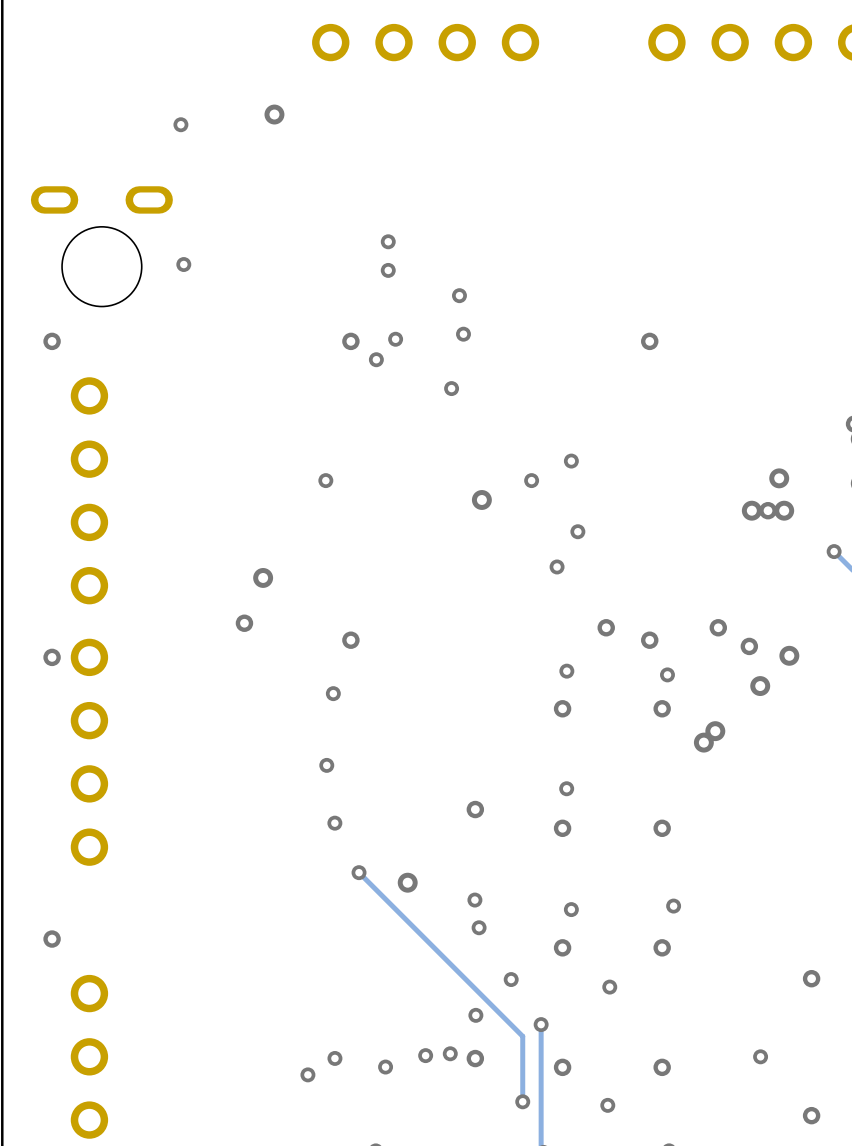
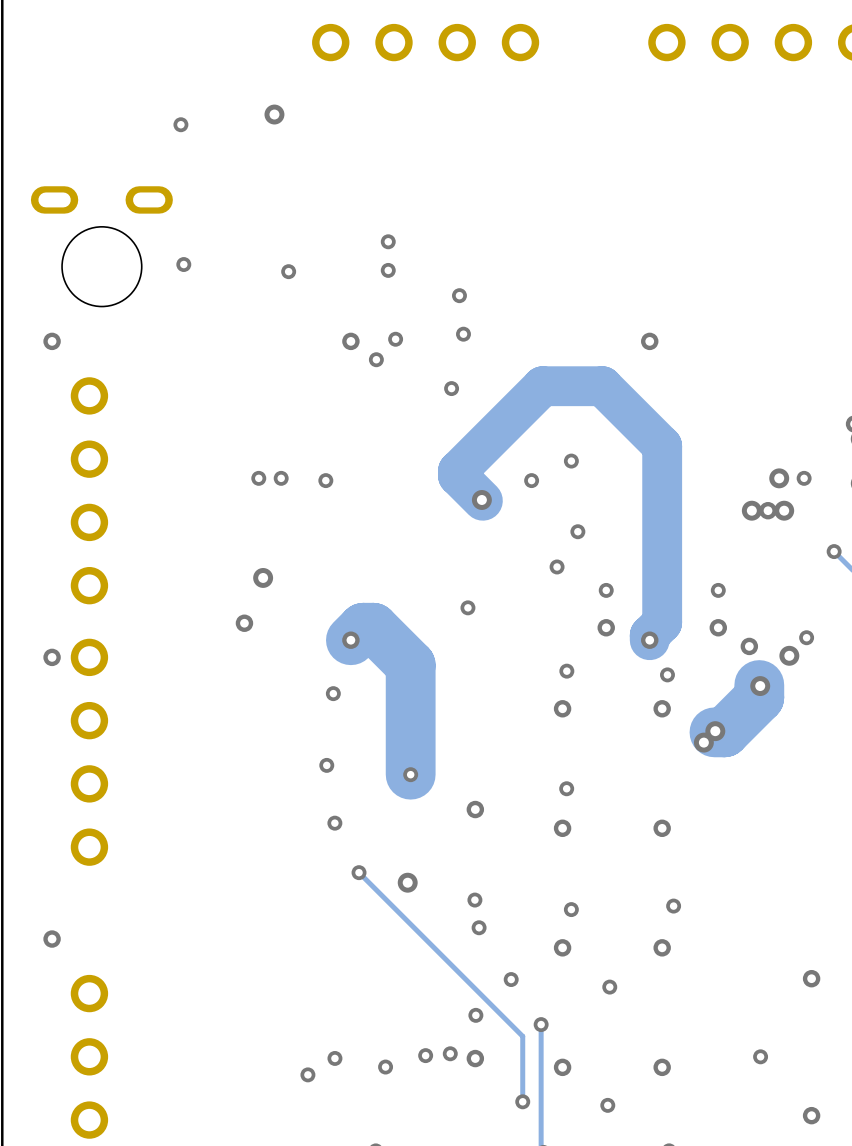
via: none -> (288, 271)
via: none -> (258, 478)
via: none -> (281, 478)
via: none -> (804, 478)
track: none -> (482, 500) (457, 475) (457, 470) (542, 386) (602, 386) (662, 445) (662, 622) (649, 635) (649, 640)
via: none -> (606, 590)
via: none -> (718, 590)
via: none -> (467, 607)
via: none -> (806, 637)
track: none -> (350, 640) (363, 627) (373, 627) (410, 665) (410, 774)
track: none -> (759, 685) (759, 697) (724, 732) (714, 732)
via: none -> (410, 774)

